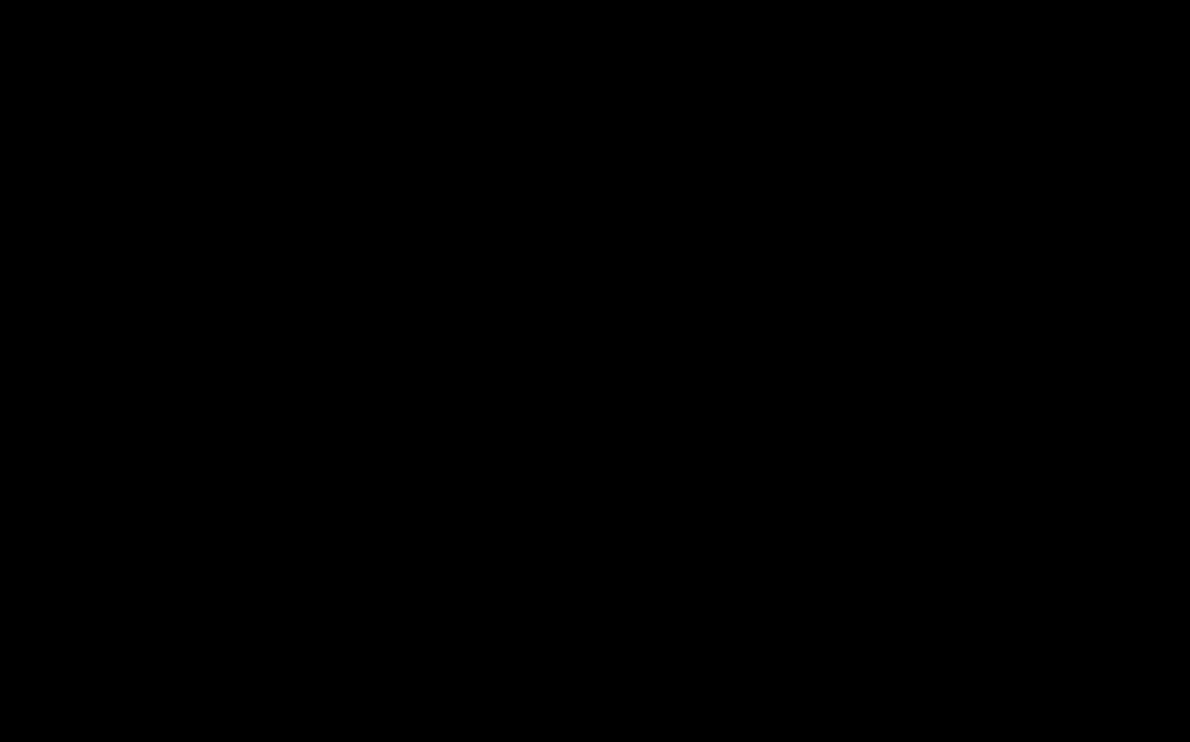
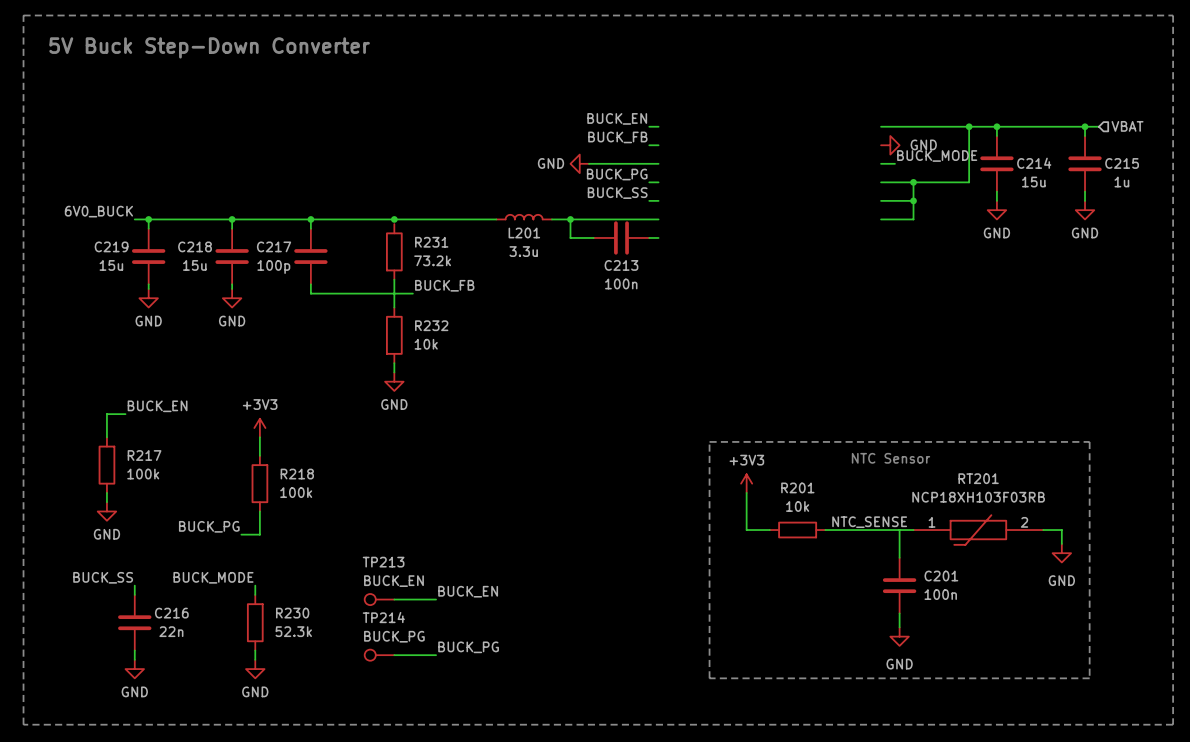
line: none -> (23, 15) (1173, 15) (1173, 724) (23, 724) (23, 15)
text: none -> 5V Buck Step-Down Converter (209, 47)
label: none -> BUCK_EN (617, 118)
wire: none -> (649, 126) (658, 126)
wire: none -> (881, 126) (1098, 126)
wire: none -> (969, 126) (969, 182) (881, 182)
junction: none -> (969, 126)
wire: none -> (996, 126) (996, 136)
junction: none -> (996, 126)
wire: none -> (1085, 126) (1085, 136)
junction: none -> (1085, 126)
hierarchical label: none -> VBAT (1127, 126)
label: none -> BUCK_FB (617, 137)
wire: none -> (649, 145) (658, 145)
power symbol: none -> GND (890, 145)
label: none -> BUCK_MODE (937, 155)
power symbol: none -> GND (579, 163)
wire: none -> (589, 163) (658, 163)
wire: none -> (881, 163) (894, 163)
C214: none -> 15u (996, 163)
C215: none -> 1u (1085, 163)
label: none -> BUCK_PG (617, 174)
wire: none -> (649, 182) (658, 182)
wire: none -> (913, 182) (913, 219) (881, 219)
junction: none -> (913, 182)
wire: none -> (996, 191) (996, 200)
wire: none -> (1085, 191) (1085, 200)
label: none -> BUCK_SS (617, 193)
wire: none -> (649, 200) (658, 200)
wire: none -> (881, 200) (913, 200)
junction: none -> (913, 200)
power symbol: none -> GND (996, 210)
power symbol: none -> GND (1085, 210)
label: none -> 6V0_BUCK (98, 211)
L201: none -> 3.3u (524, 217)
wire: none -> (134, 219) (496, 219)
wire: none -> (148, 219) (148, 228)
junction: none -> (148, 219)
wire: none -> (232, 219) (232, 228)
junction: none -> (232, 219)
wire: none -> (310, 219) (310, 228)
junction: none -> (310, 219)
junction: none -> (394, 219)
wire: none -> (551, 219) (658, 219)
wire: none -> (570, 219) (570, 237) (593, 237)
junction: none -> (570, 219)
C213: none -> 100n (621, 237)
wire: none -> (649, 237) (658, 237)
R231: none -> 73.2k (394, 251)
C219: none -> 15u (148, 256)
C218: none -> 15u (232, 256)
C217: none -> 100p (310, 256)
wire: none -> (394, 279) (394, 307)
wire: none -> (148, 284) (148, 288)
wire: none -> (232, 284) (232, 288)
wire: none -> (310, 284) (310, 293) (412, 293)
label: none -> BUCK_FB (444, 285)
power symbol: none -> GND (148, 298)
power symbol: none -> GND (232, 298)
R232: none -> 10k (394, 335)
wire: none -> (394, 363) (394, 372)
power symbol: none -> GND (394, 381)
label: none -> BUCK_EN (157, 406)
wire: none -> (125, 414) (106, 414) (106, 437)
power symbol: none -> +3V3 (259, 428)
wire: none -> (259, 437) (259, 455)
line: none -> (709, 441) (1089, 441) (1089, 678) (709, 678) (709, 441)
text: none -> NTC Sensor (890, 458)
R217: none -> 100k (106, 465)
R218: none -> 100k (259, 483)
power symbol: none -> +3V3 (746, 483)
wire: none -> (106, 492) (106, 502)
wire: none -> (746, 492) (746, 530) (769, 530)
power symbol: none -> GND (106, 511)
wire: none -> (259, 511) (259, 534) (241, 534)
label: none -> NTC_SENSE (869, 522)
label: none -> BUCK_PG (209, 526)
R201: none -> 10k (797, 530)
wire: none -> (825, 530) (913, 530)
wire: none -> (899, 530) (899, 557)
RT201: none -> NCP18XH103F03RB (978, 530)
wire: none -> (1043, 530) (1061, 530) (1061, 543)
power symbol: none -> GND (1061, 553)
label: none -> BUCK_SS (103, 577)
label: none -> BUCK_MODE (213, 577)
wire: none -> (134, 585) (134, 594)
wire: none -> (255, 585) (255, 594)
C201: none -> 100n (899, 585)
label: none -> BUCK_EN (468, 591)
TP213: none -> BUCK_EN (379, 599)
wire: none -> (394, 599) (436, 599)
wire: none -> (899, 613) (899, 627)
C216: none -> 22n (134, 622)
R230: none -> 52.3k (255, 622)
power symbol: none -> GND (899, 636)
label: none -> BUCK_PG (468, 647)
wire: none -> (134, 650) (134, 659)
wire: none -> (255, 650) (255, 659)
TP214: none -> BUCK_PG (379, 655)
wire: none -> (394, 655) (436, 655)
power symbol: none -> GND (134, 669)
power symbol: none -> GND (255, 669)

